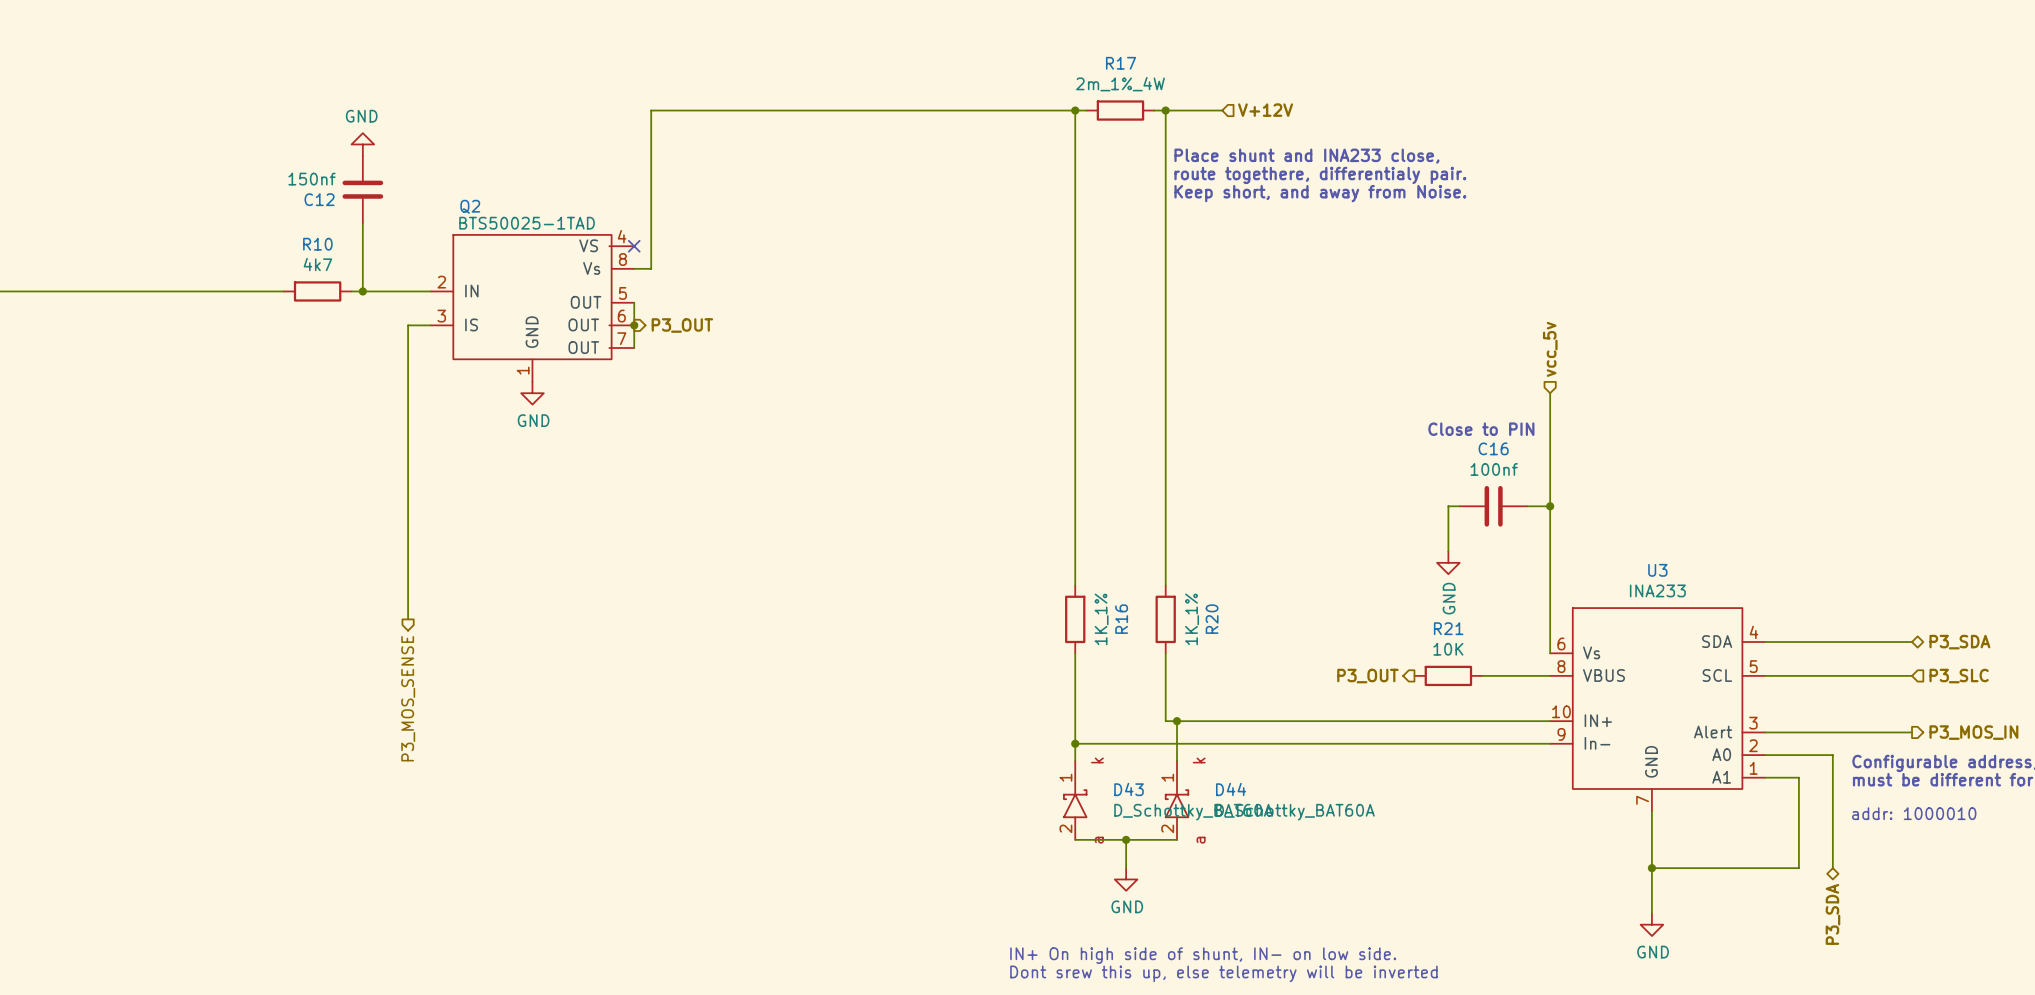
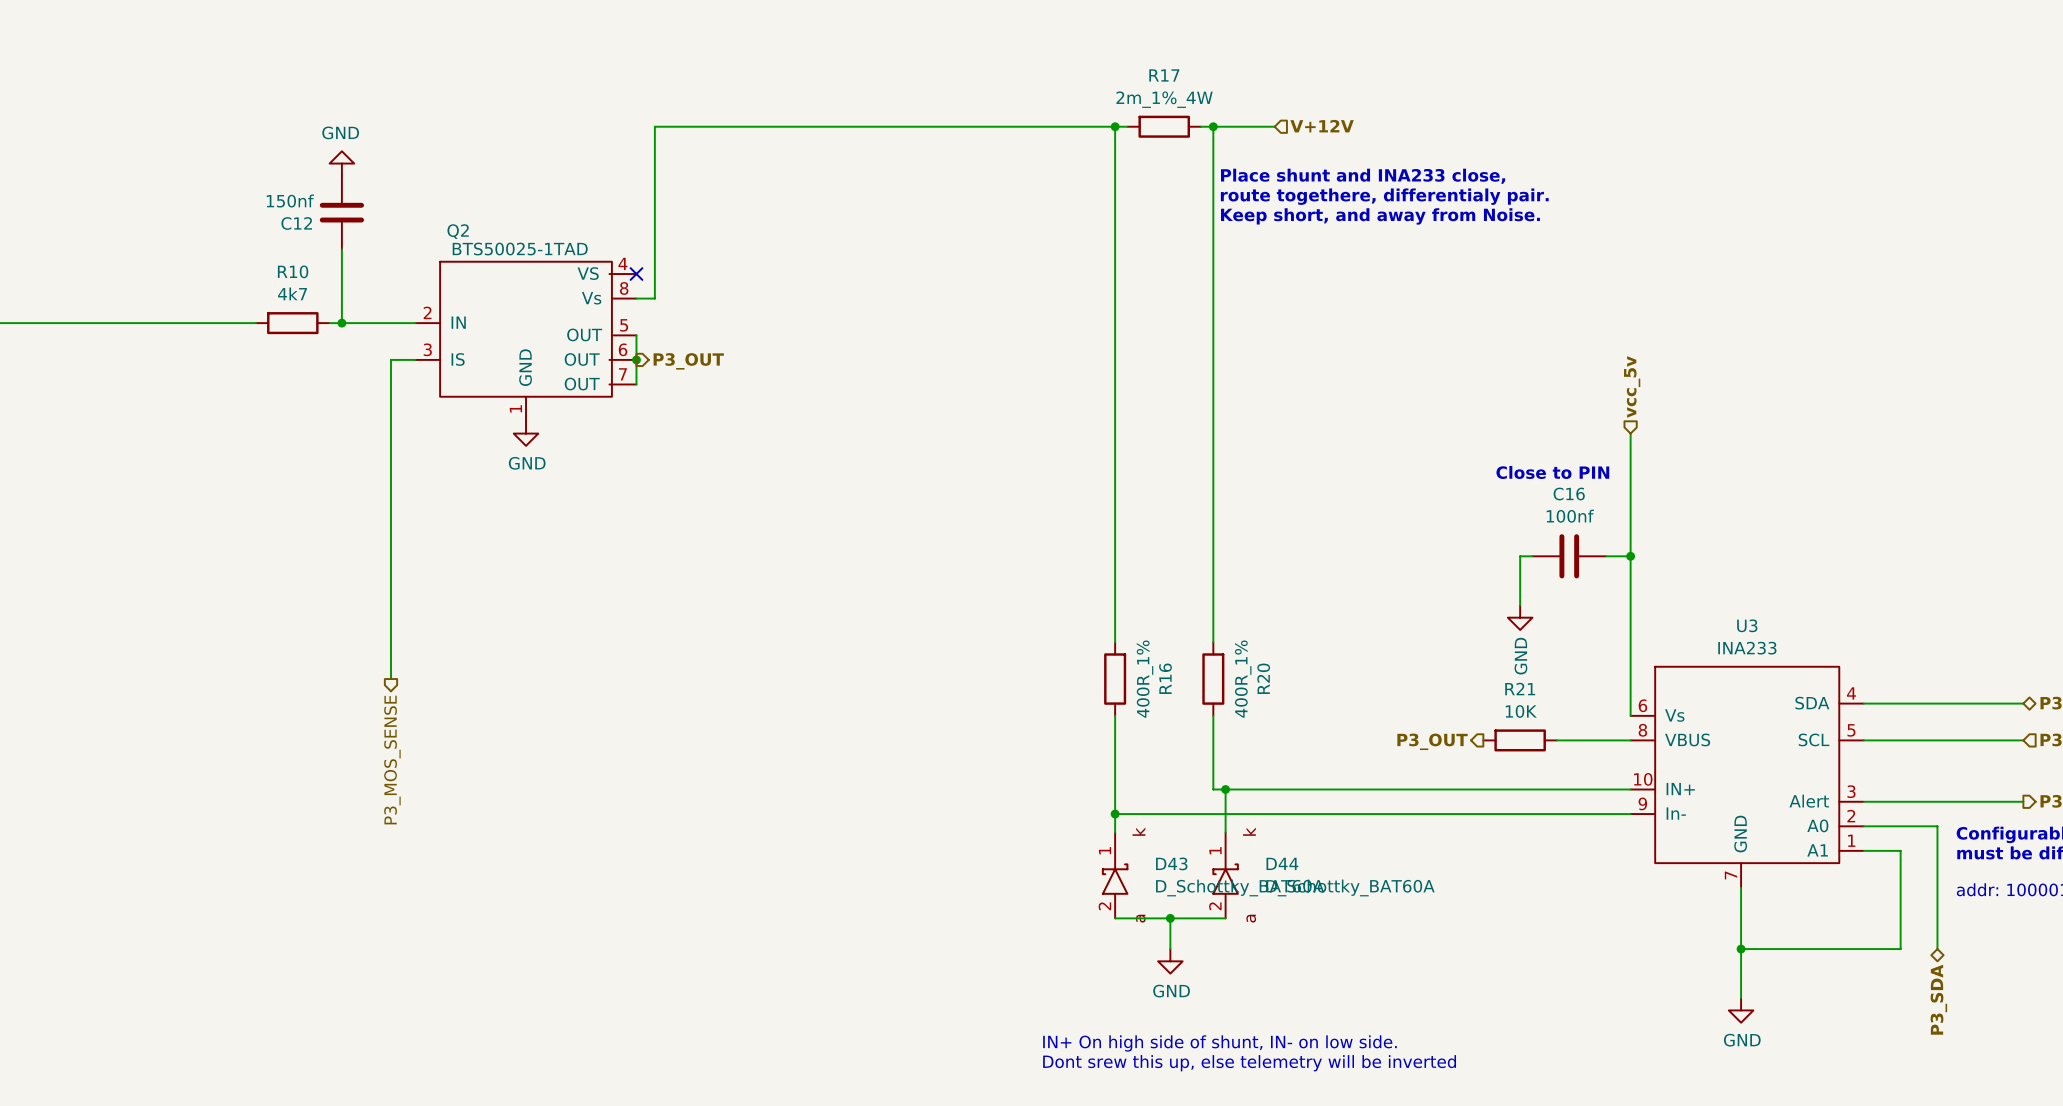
R16 value: 1K_1% (1101, 619) -> 400R_1% (1145, 679)
R20 value: 1K_1% (1192, 619) -> 400R_1% (1243, 679)

